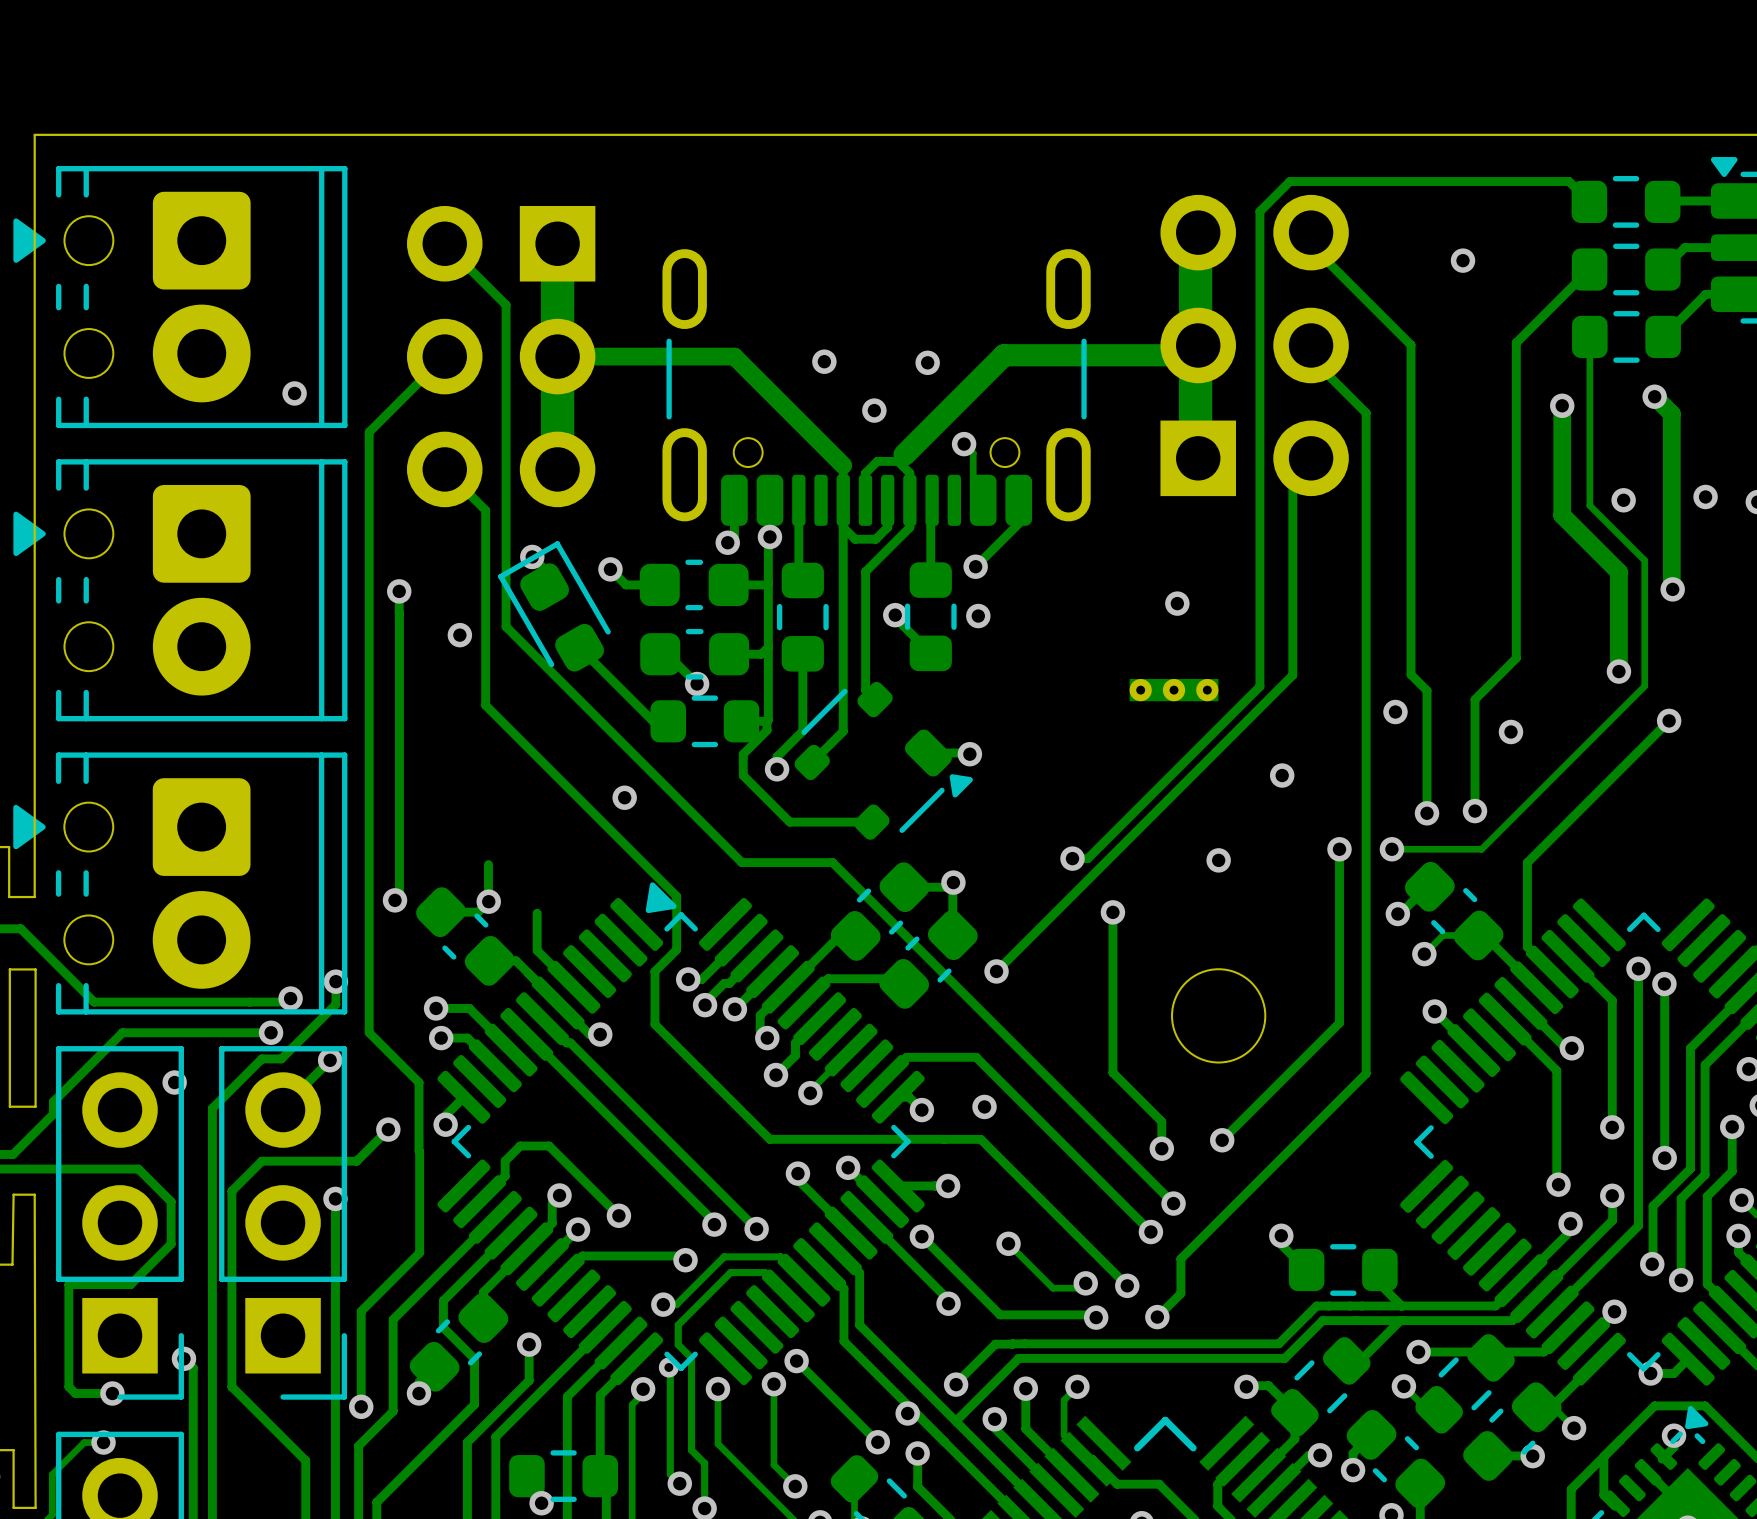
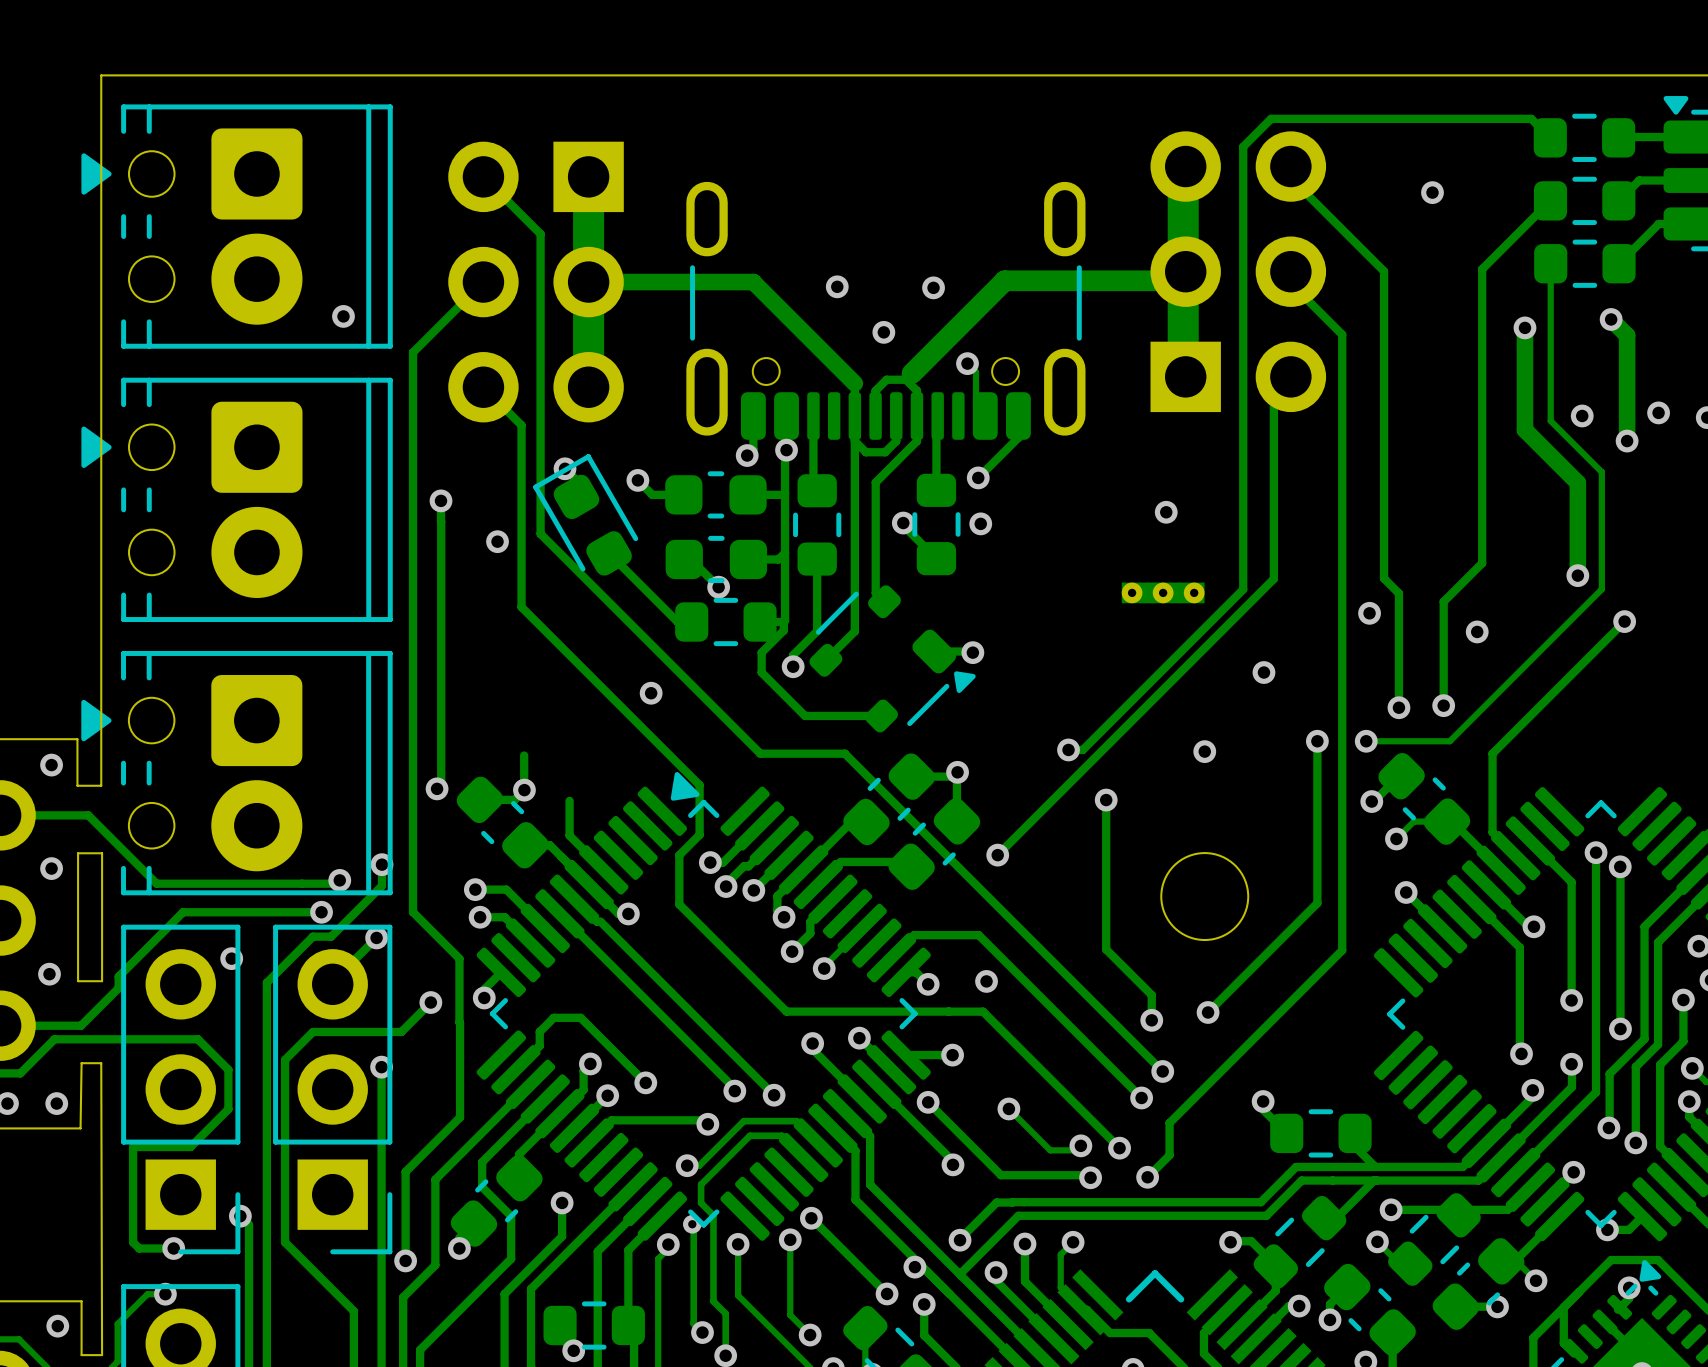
track: (1671, 527) (1672, 589) -> none
via position: (1672, 589) -> (1627, 441)

